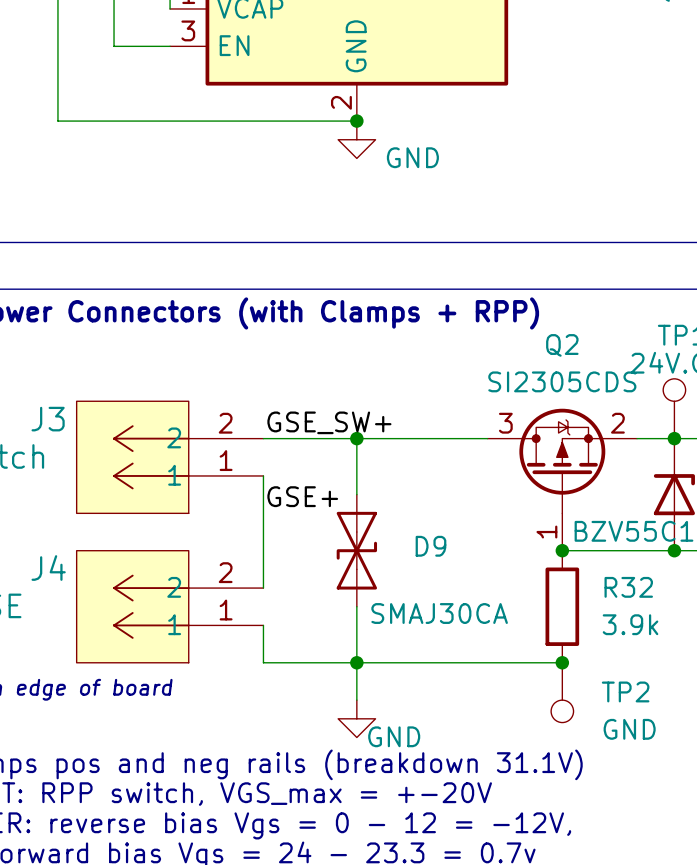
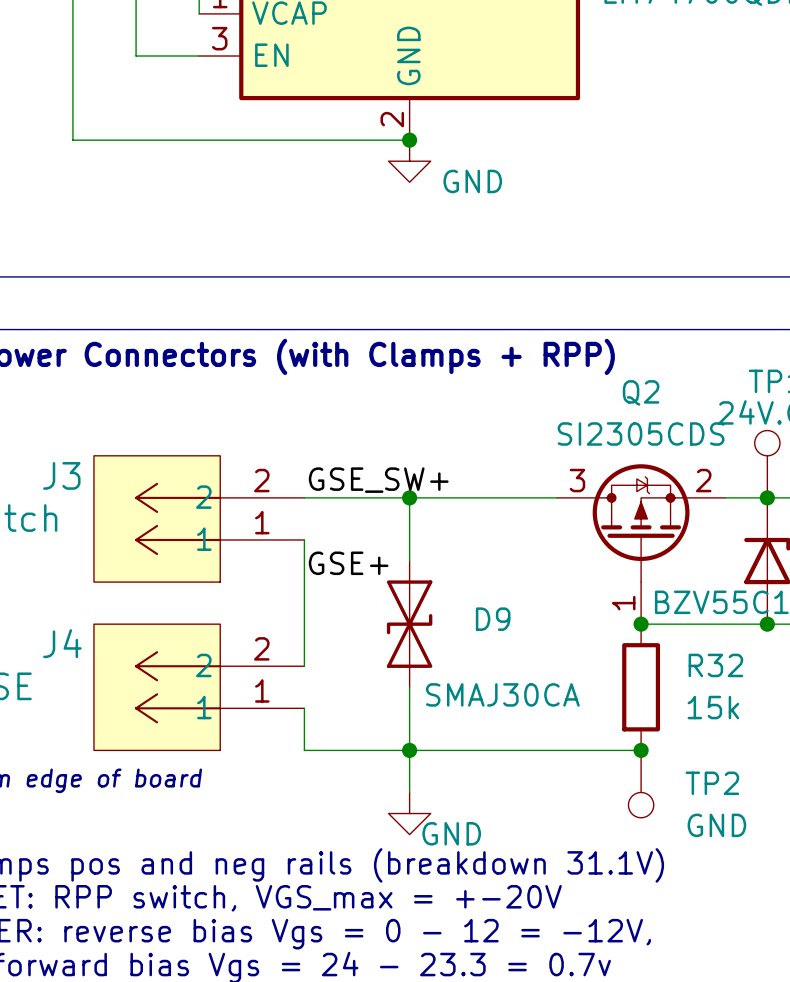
R32 value: 3.9k (630, 624) -> 15k (713, 707)

